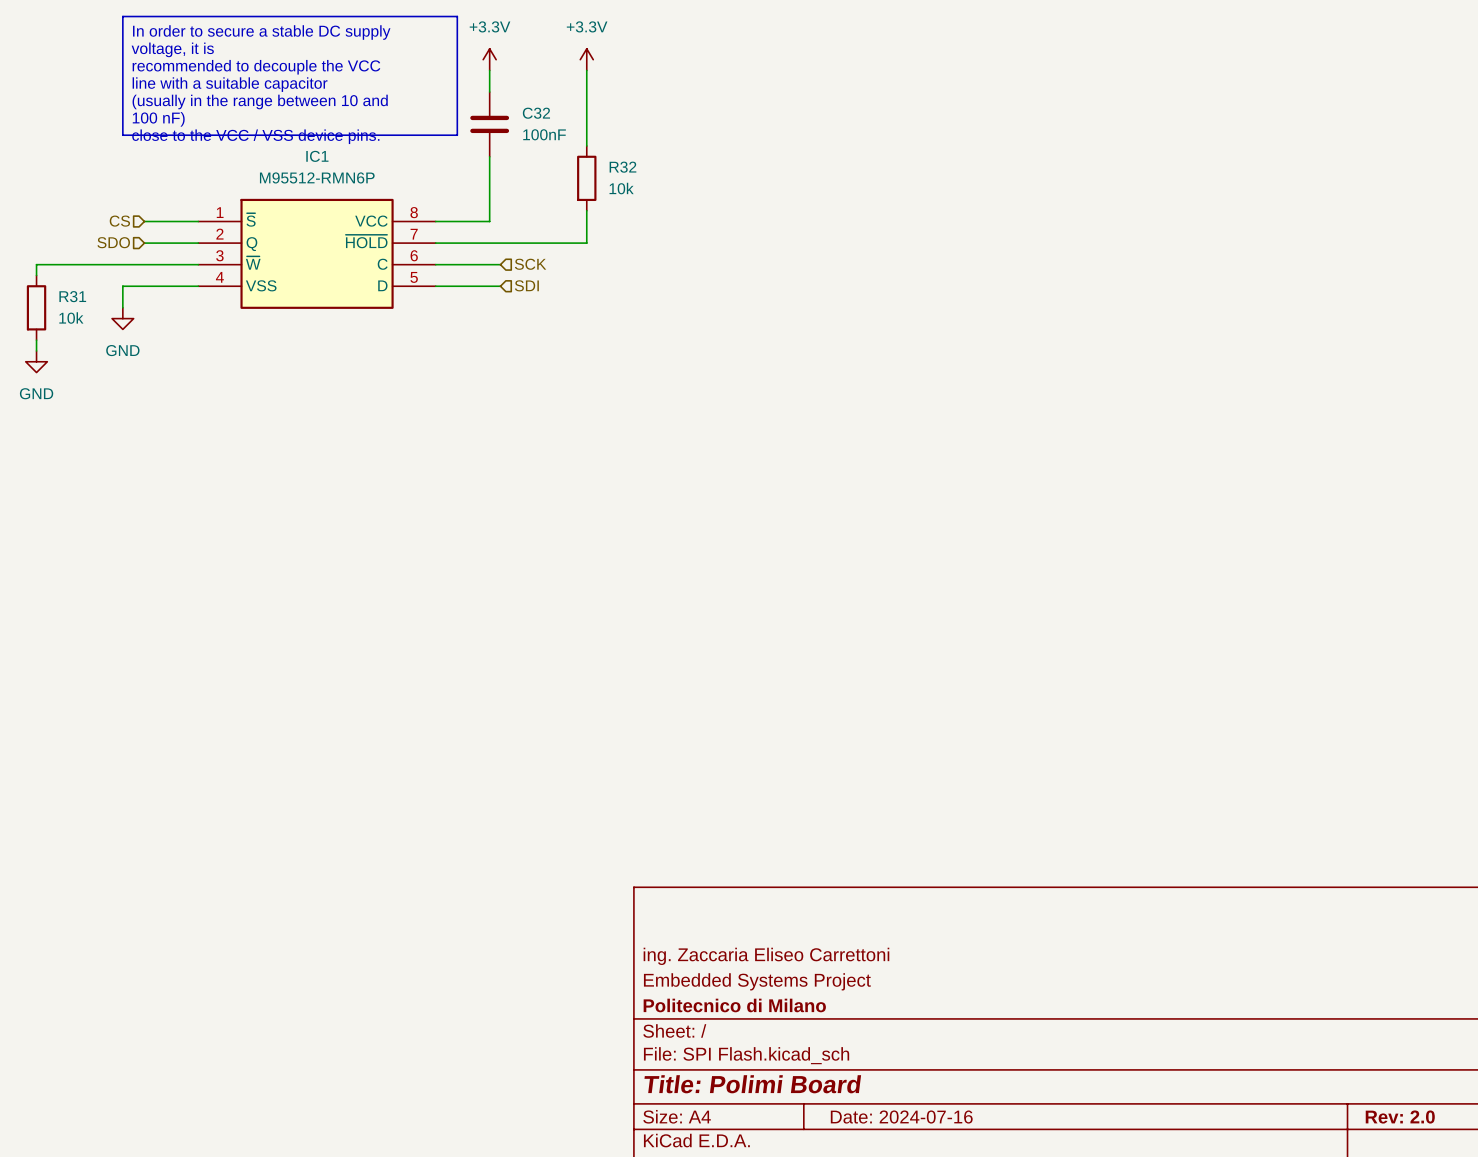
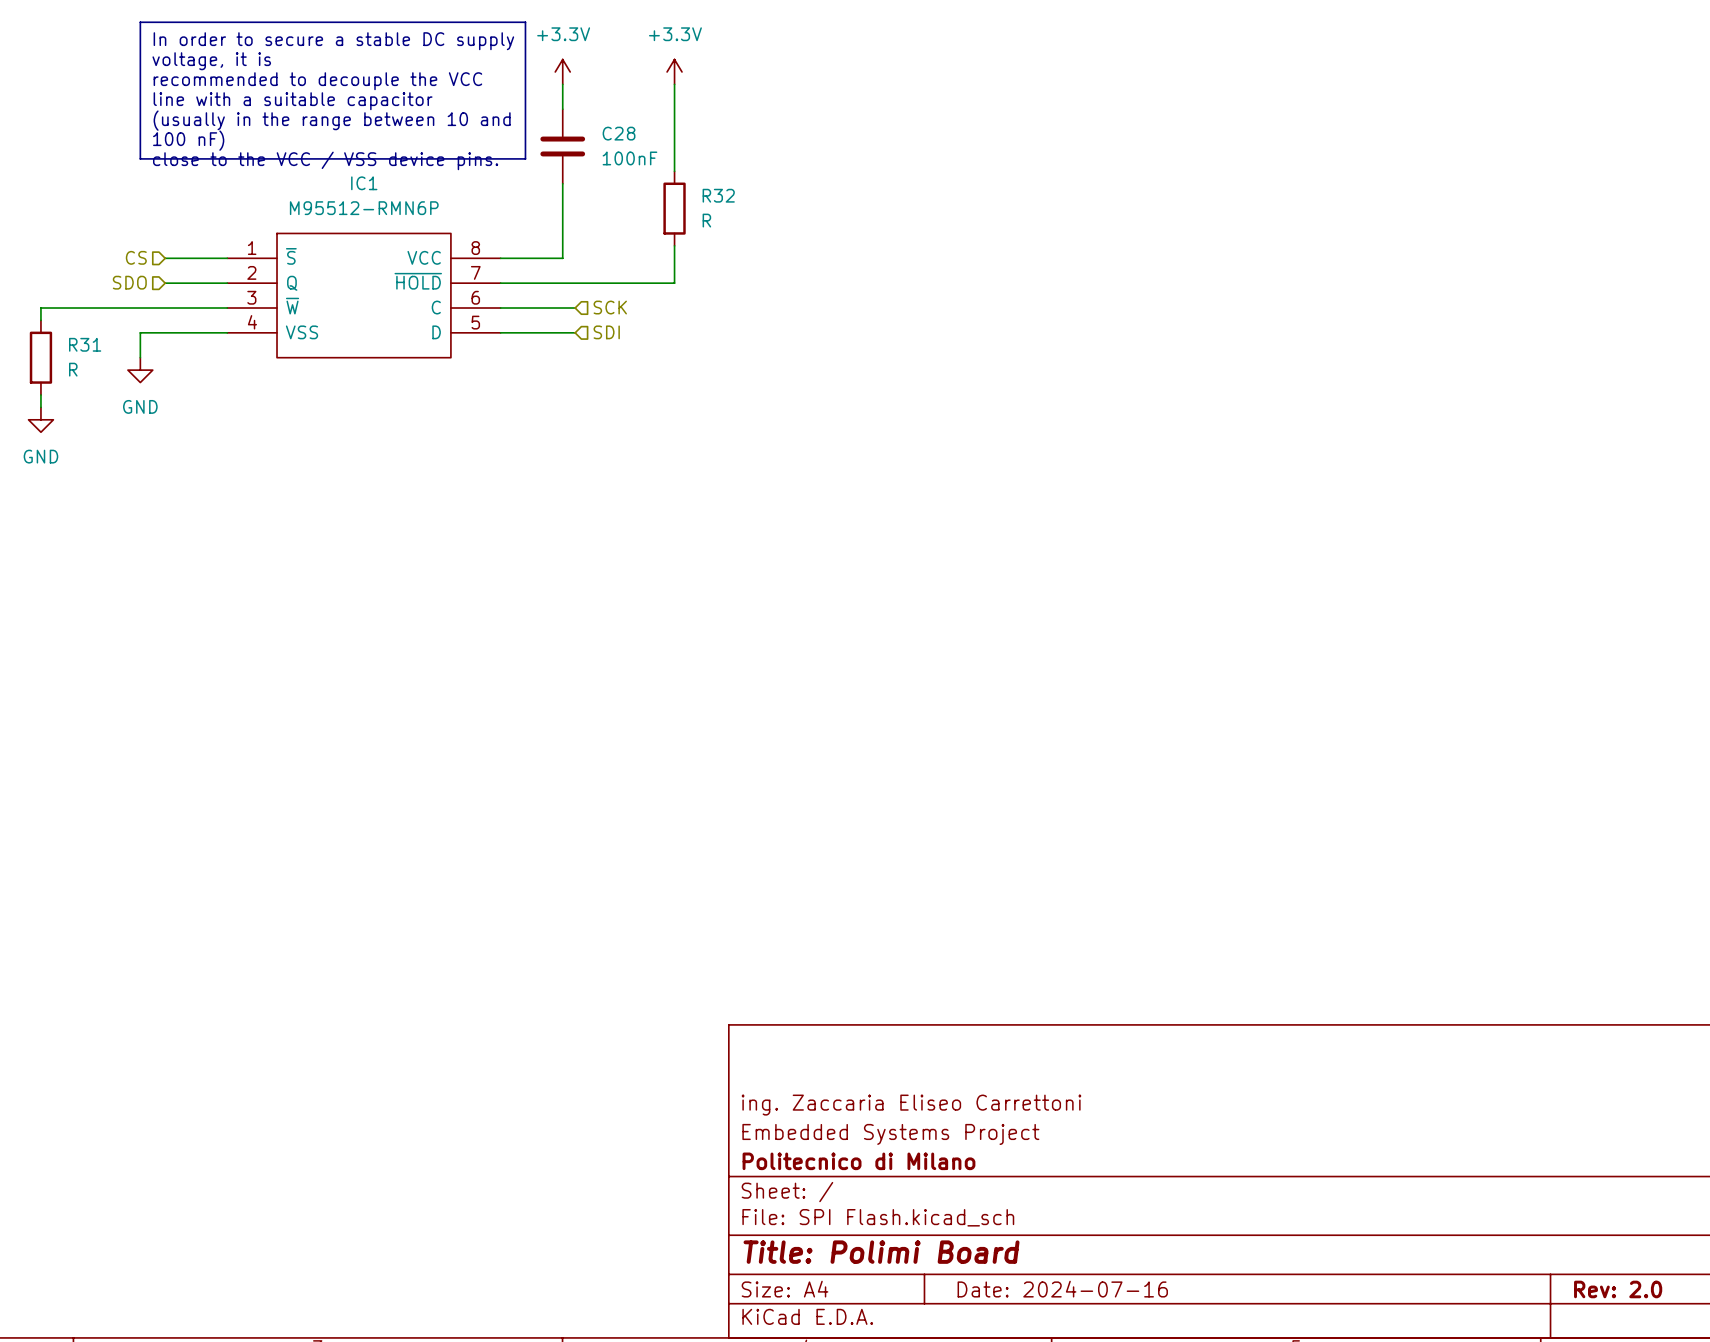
C32 name: C32 (536, 113) -> C28 (619, 133)
R32 value: 10k (621, 188) -> R (706, 220)
IC1 symbol: [198, 198, 436, 309] -> [227, 232, 501, 359]
R31 value: 10k (71, 317) -> R (73, 369)

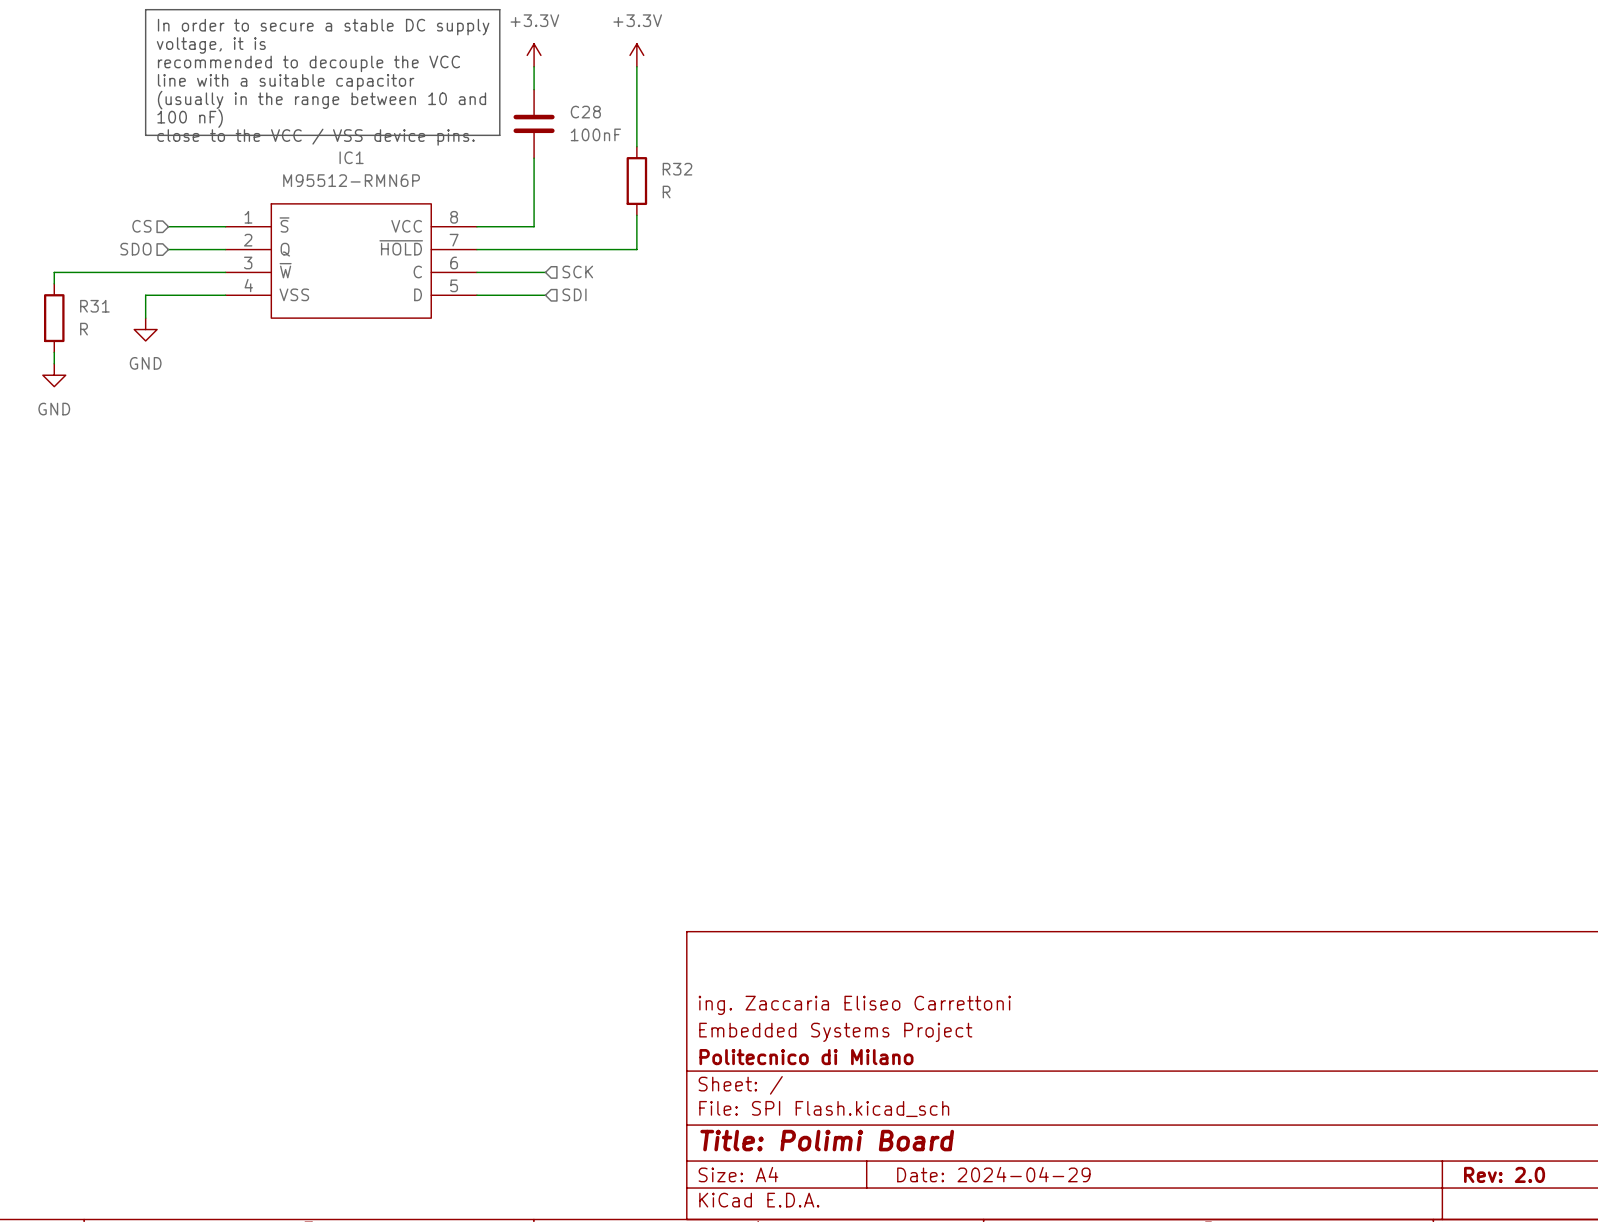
title block: Date: 2024-07-16 (1062, 1289) -> Date: 2024-04-29 (993, 1174)

